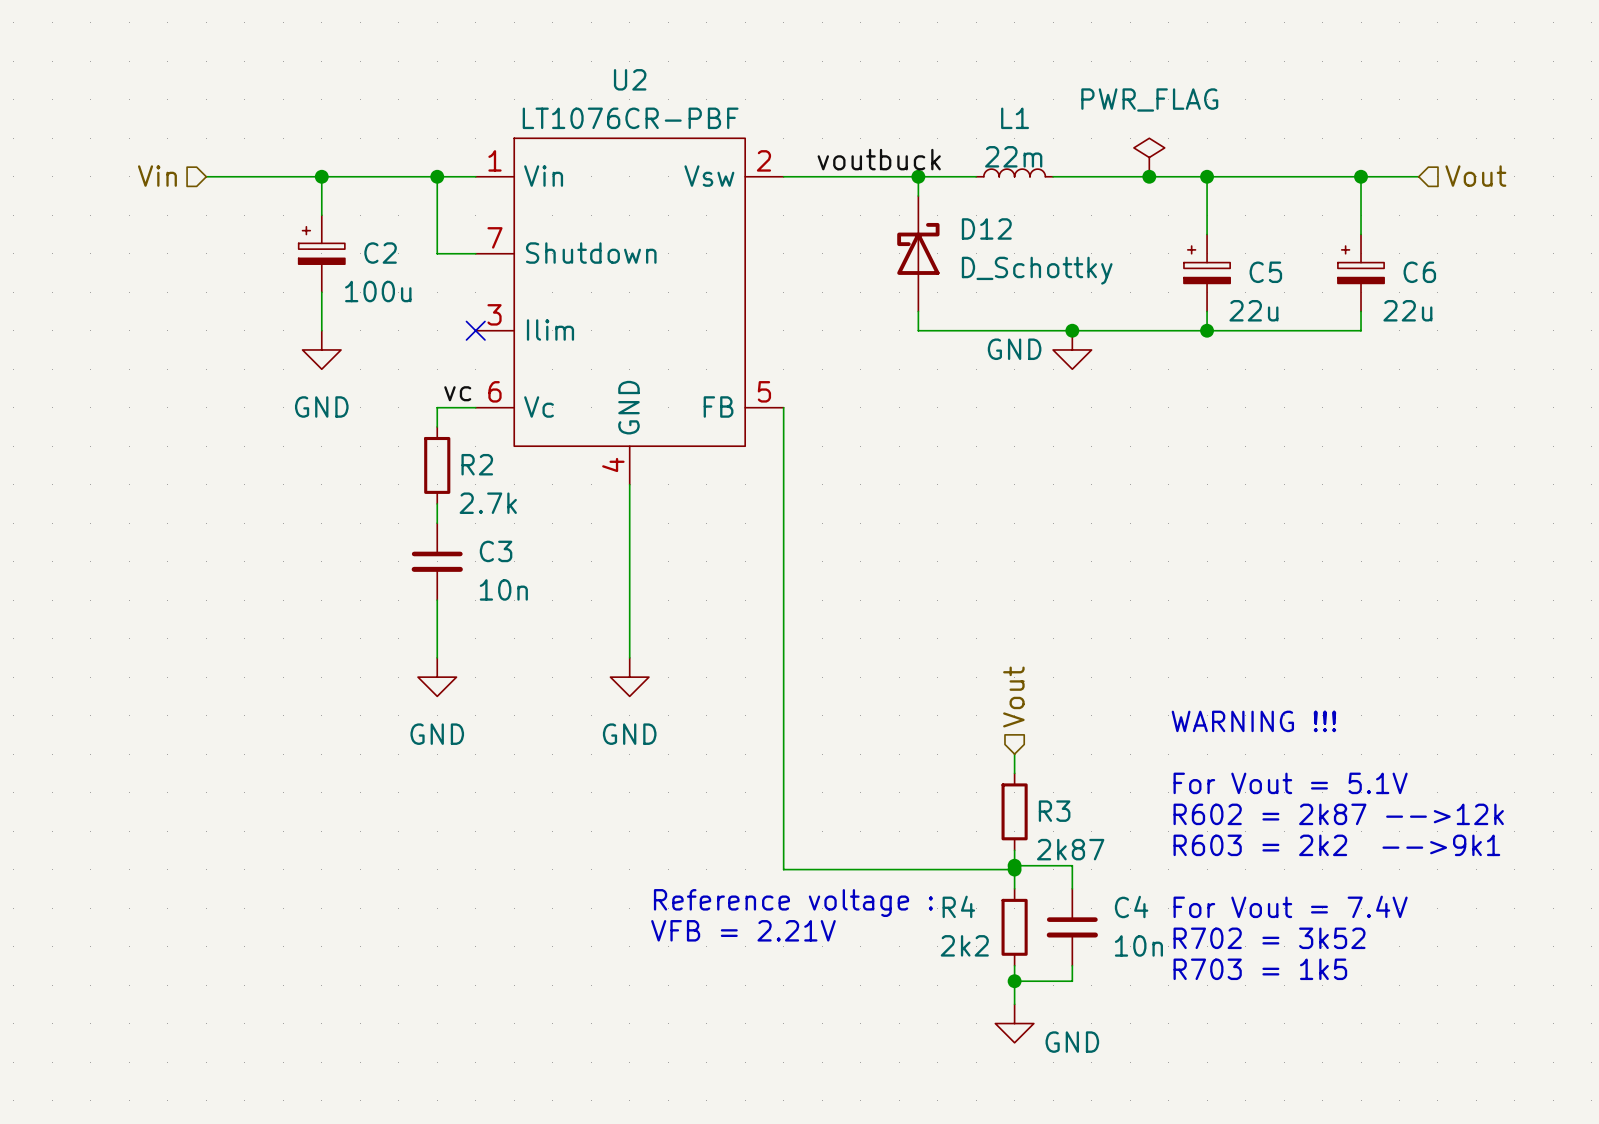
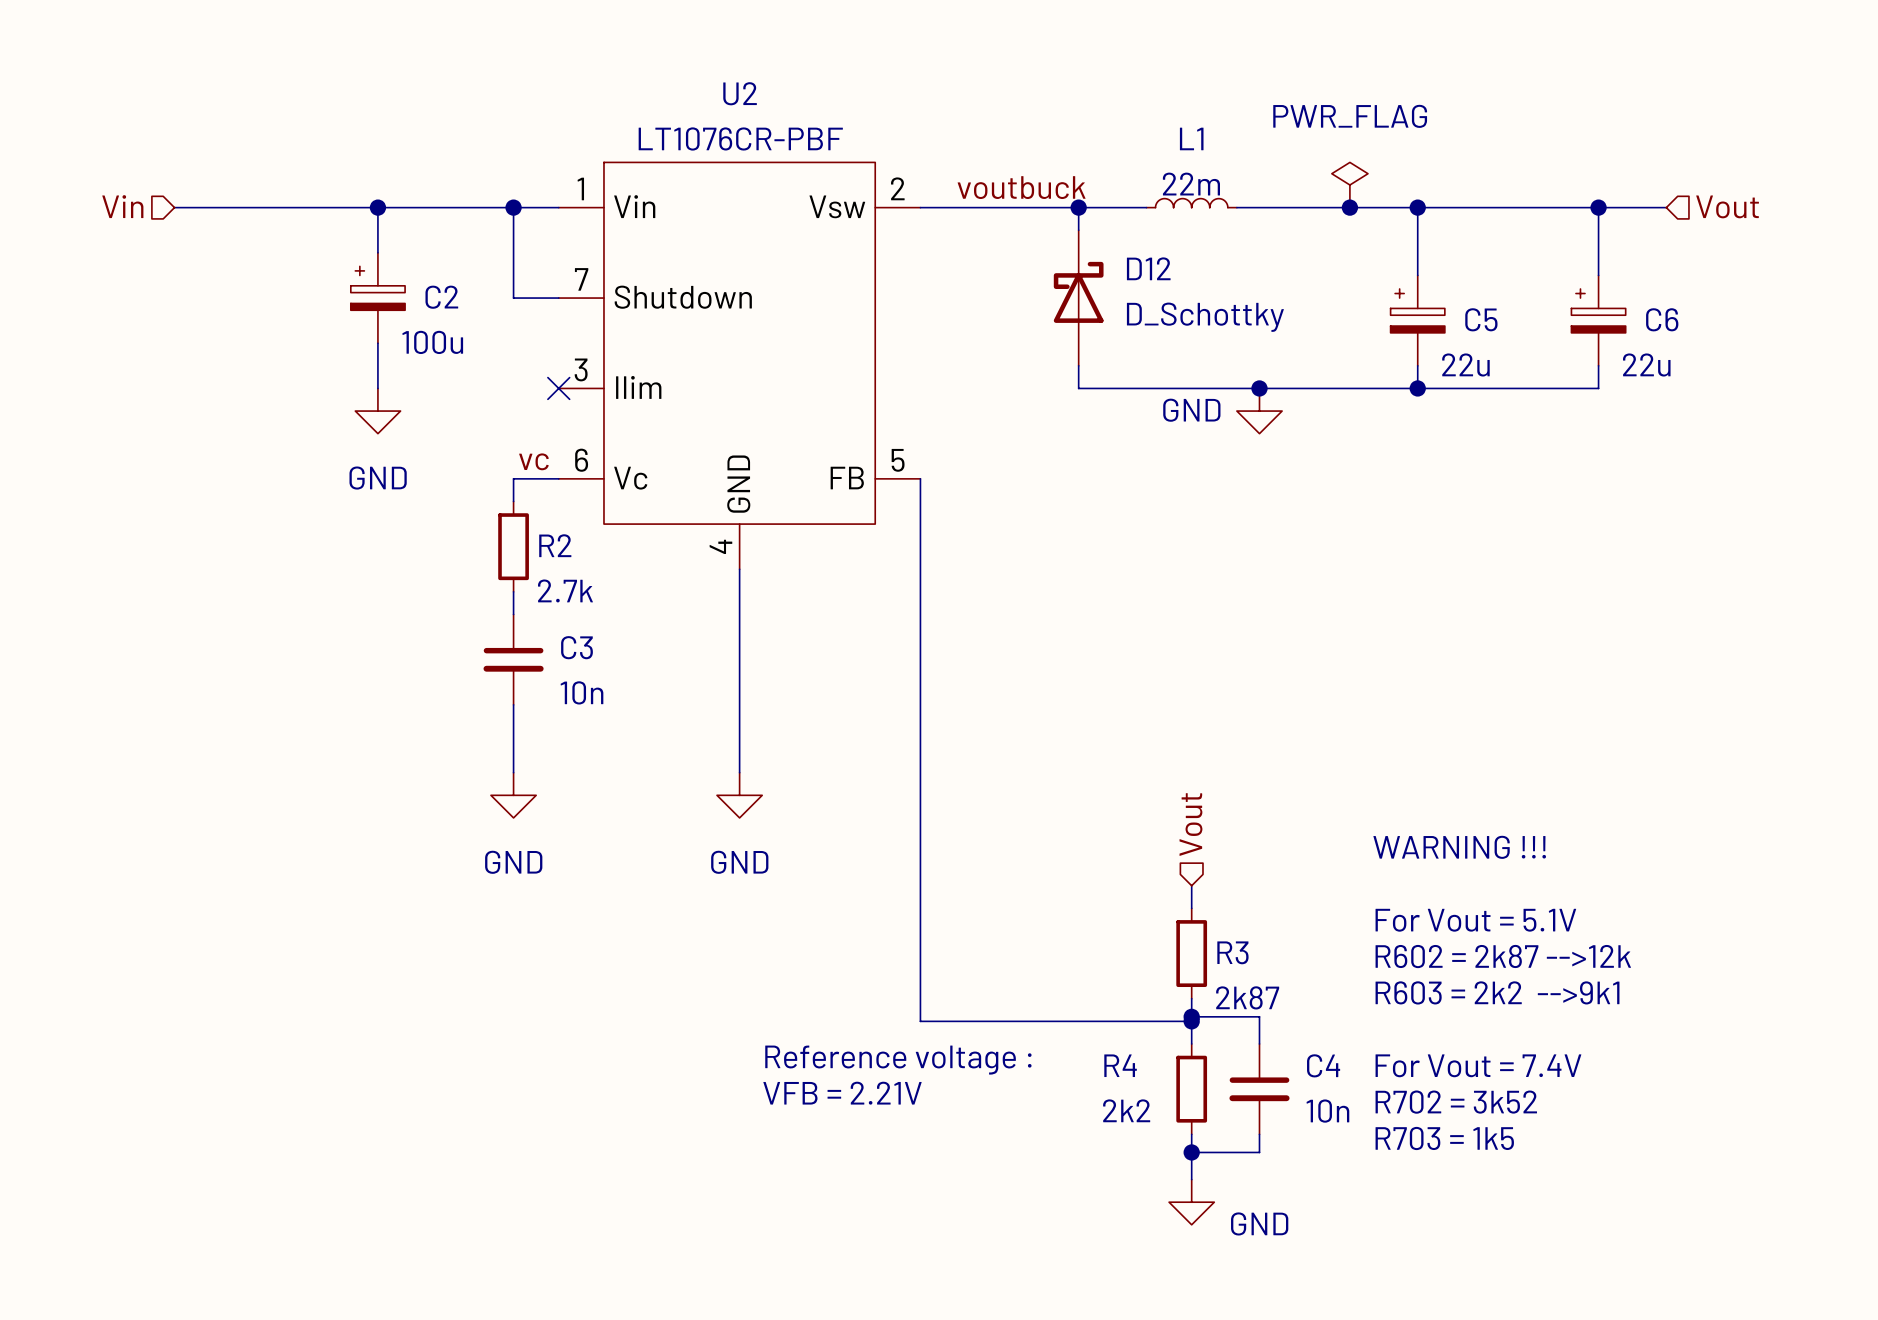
wire: none -> (174, 207) (242, 207)
hierarchical label position: Vin (157, 176) -> Vin (122, 206)

